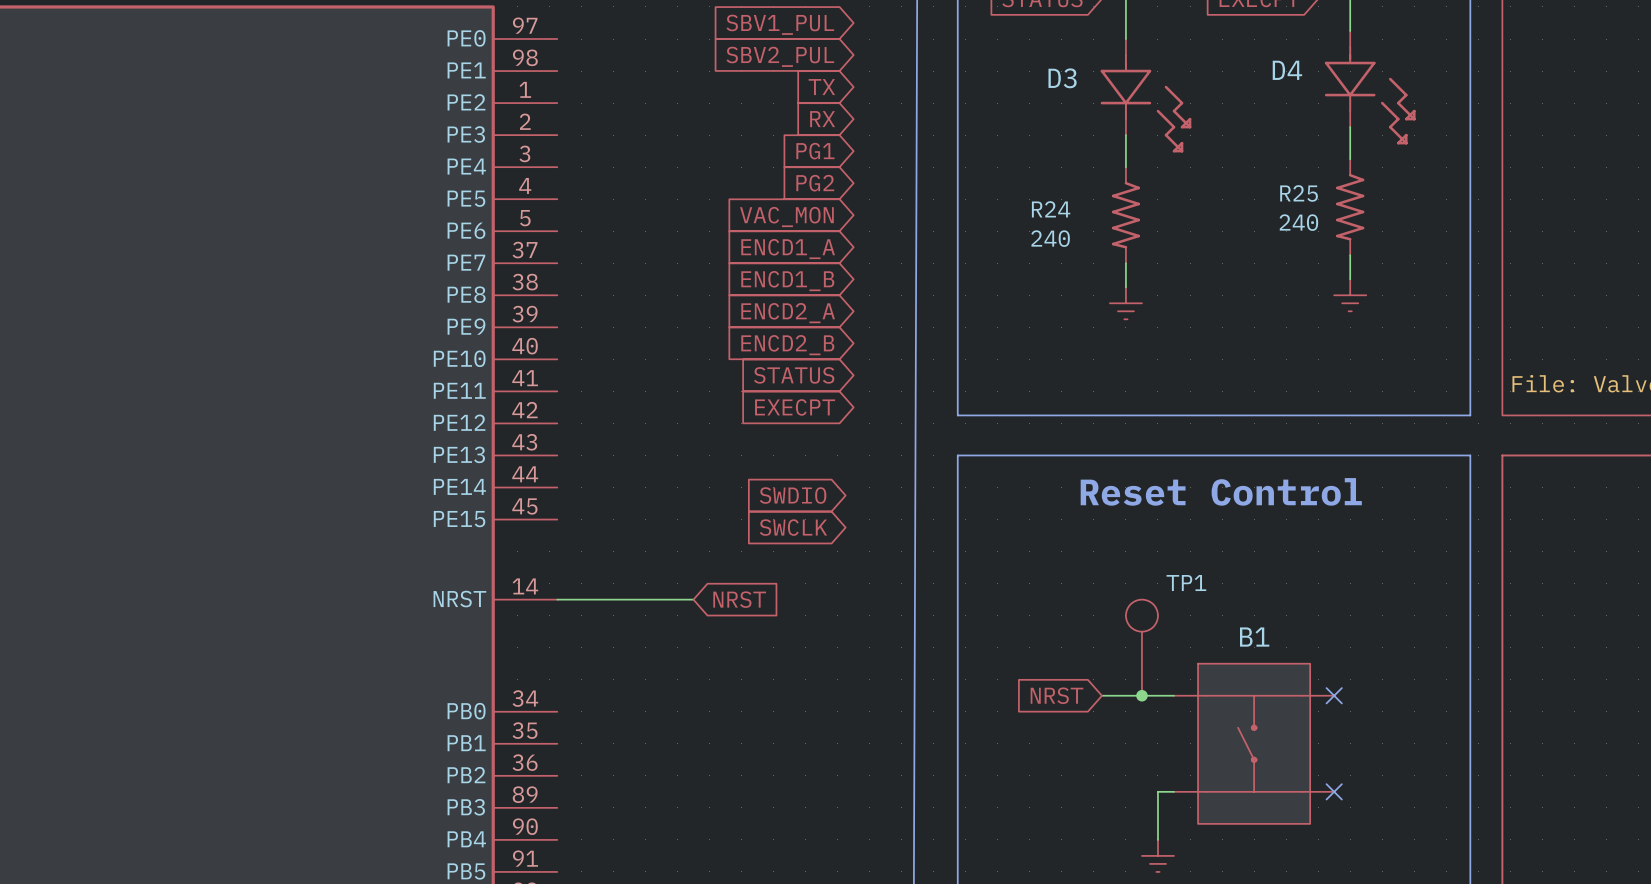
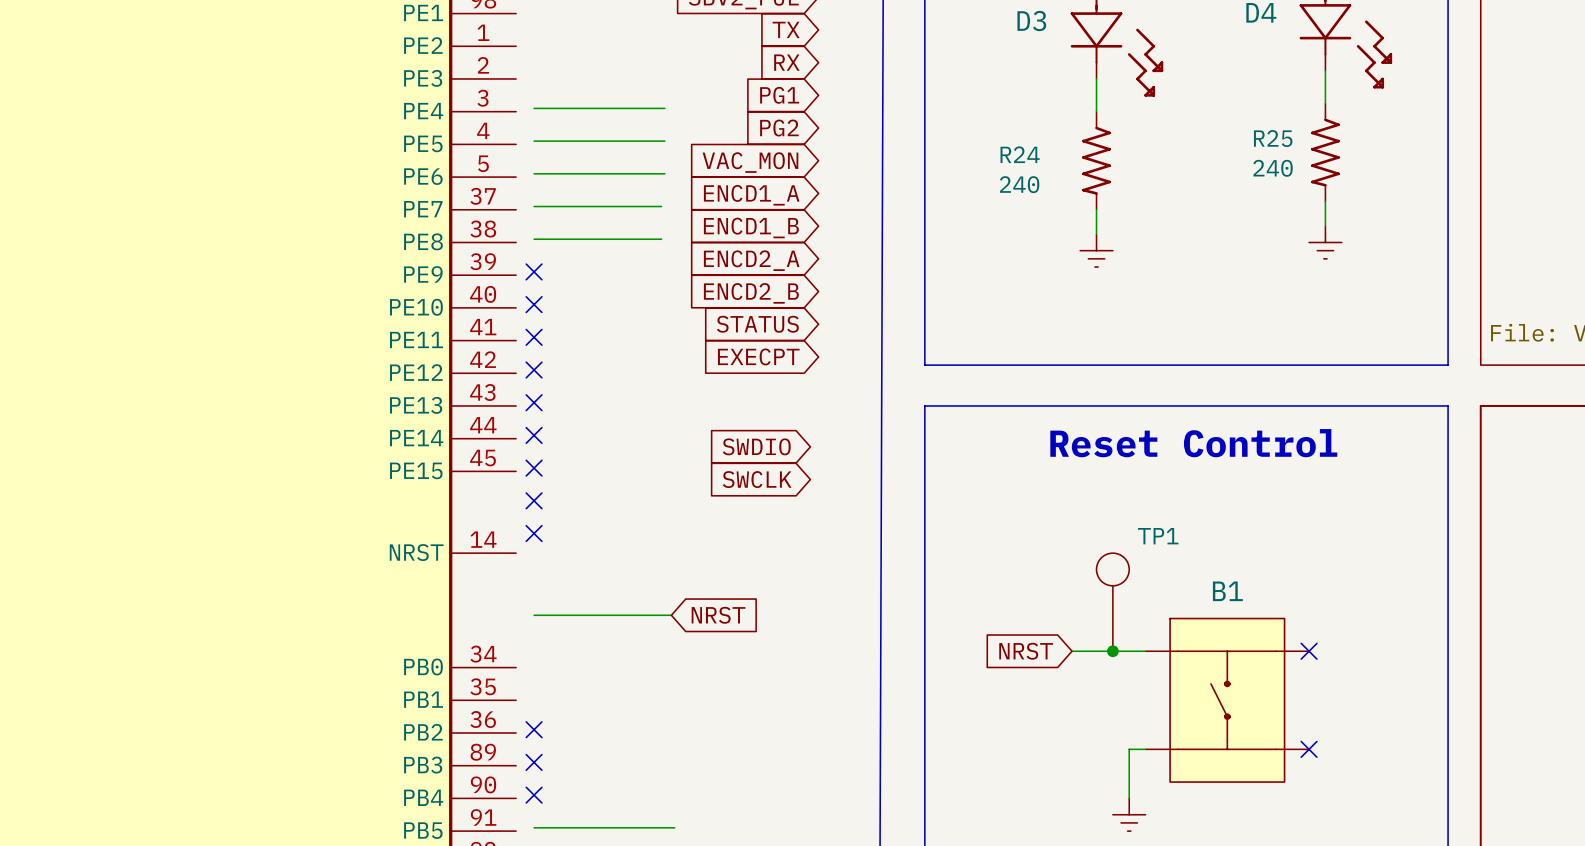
wire: none -> (534, 108) (664, 108)
wire: none -> (534, 141) (664, 141)
wire: none -> (534, 173) (664, 173)
wire: none -> (534, 206) (661, 206)
wire: none -> (534, 239) (661, 239)
no-connect mark: none -> (534, 271)
no-connect mark: none -> (534, 304)
no-connect mark: none -> (534, 337)
no-connect mark: none -> (534, 370)
no-connect mark: none -> (534, 402)
no-connect mark: none -> (534, 435)
no-connect mark: none -> (534, 468)
no-connect mark: none -> (534, 500)
no-connect mark: none -> (534, 533)
wire: (557, 599) (693, 599) -> none
global label position: NRST (739, 599) -> NRST (718, 615)
wire: none -> (534, 615) (671, 615)
no-connect mark: none -> (534, 729)
no-connect mark: none -> (534, 762)
no-connect mark: none -> (534, 795)
wire: none -> (534, 827) (674, 827)

